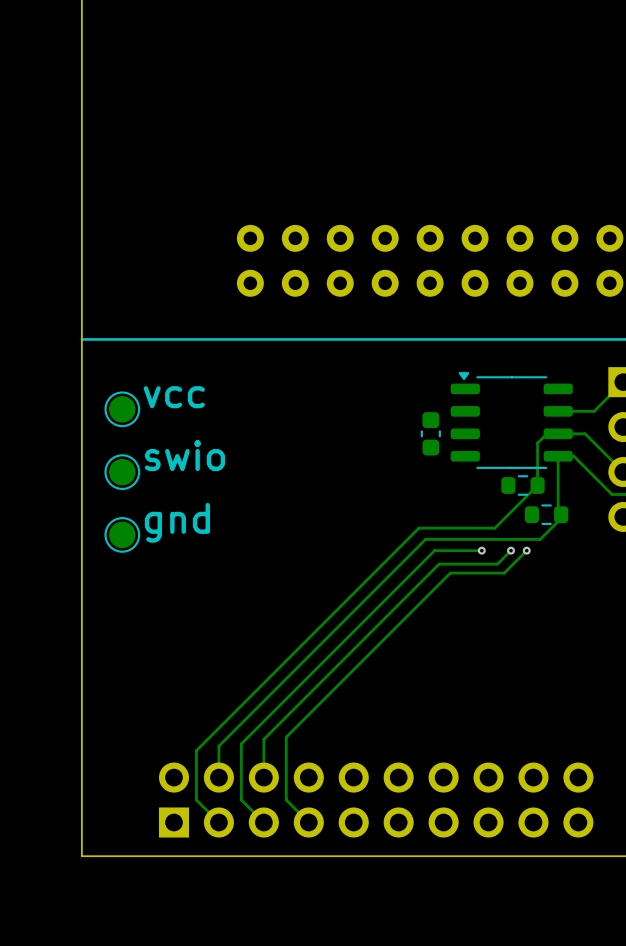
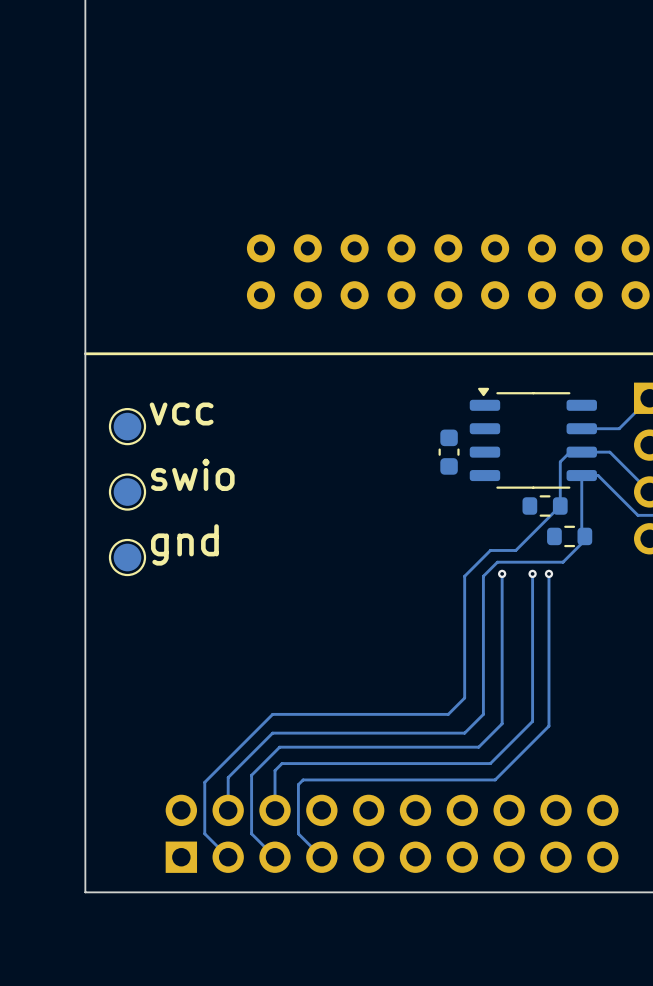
track: (470, 528) (418, 528) (261, 685) -> (490, 550) (464, 576) (464, 698) (448, 714) (272, 714)
track: (477, 539) (425, 539) (261, 703) -> (497, 562) (483, 576) (483, 714) (464, 733) (272, 733)
track: (481, 550) (434, 550) (268, 716) -> (502, 573) (502, 723) (478, 747) (279, 747)
track: (511, 550) (497, 564) (439, 564) (270, 732) -> (532, 573) (532, 721) (490, 763) (282, 763)
track: (526, 550) (504, 573) (450, 573) (286, 737) (286, 752) -> (548, 573) (548, 726) (495, 779) (303, 779) (298, 784)

